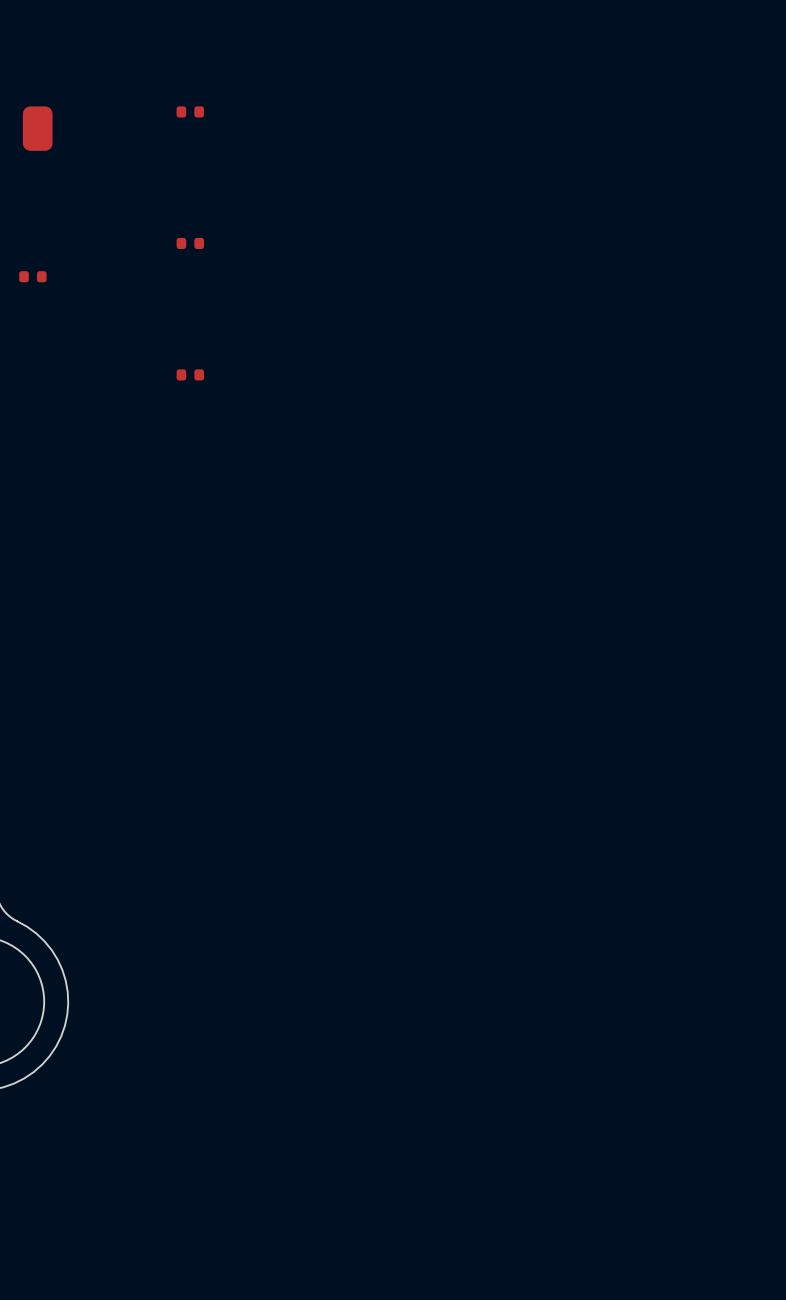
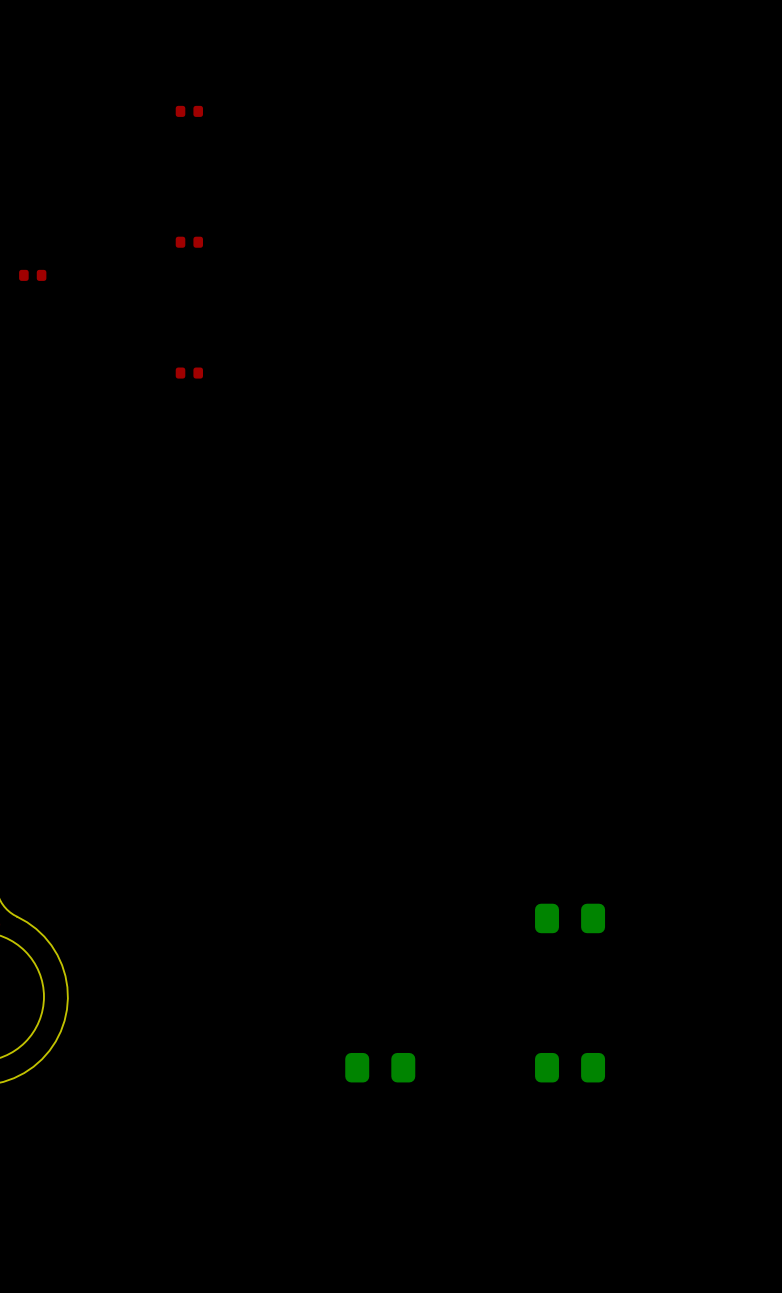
part: (37, 128) -> none
part: none -> (570, 918)
part: none -> (380, 1067)
part: none -> (570, 1067)

